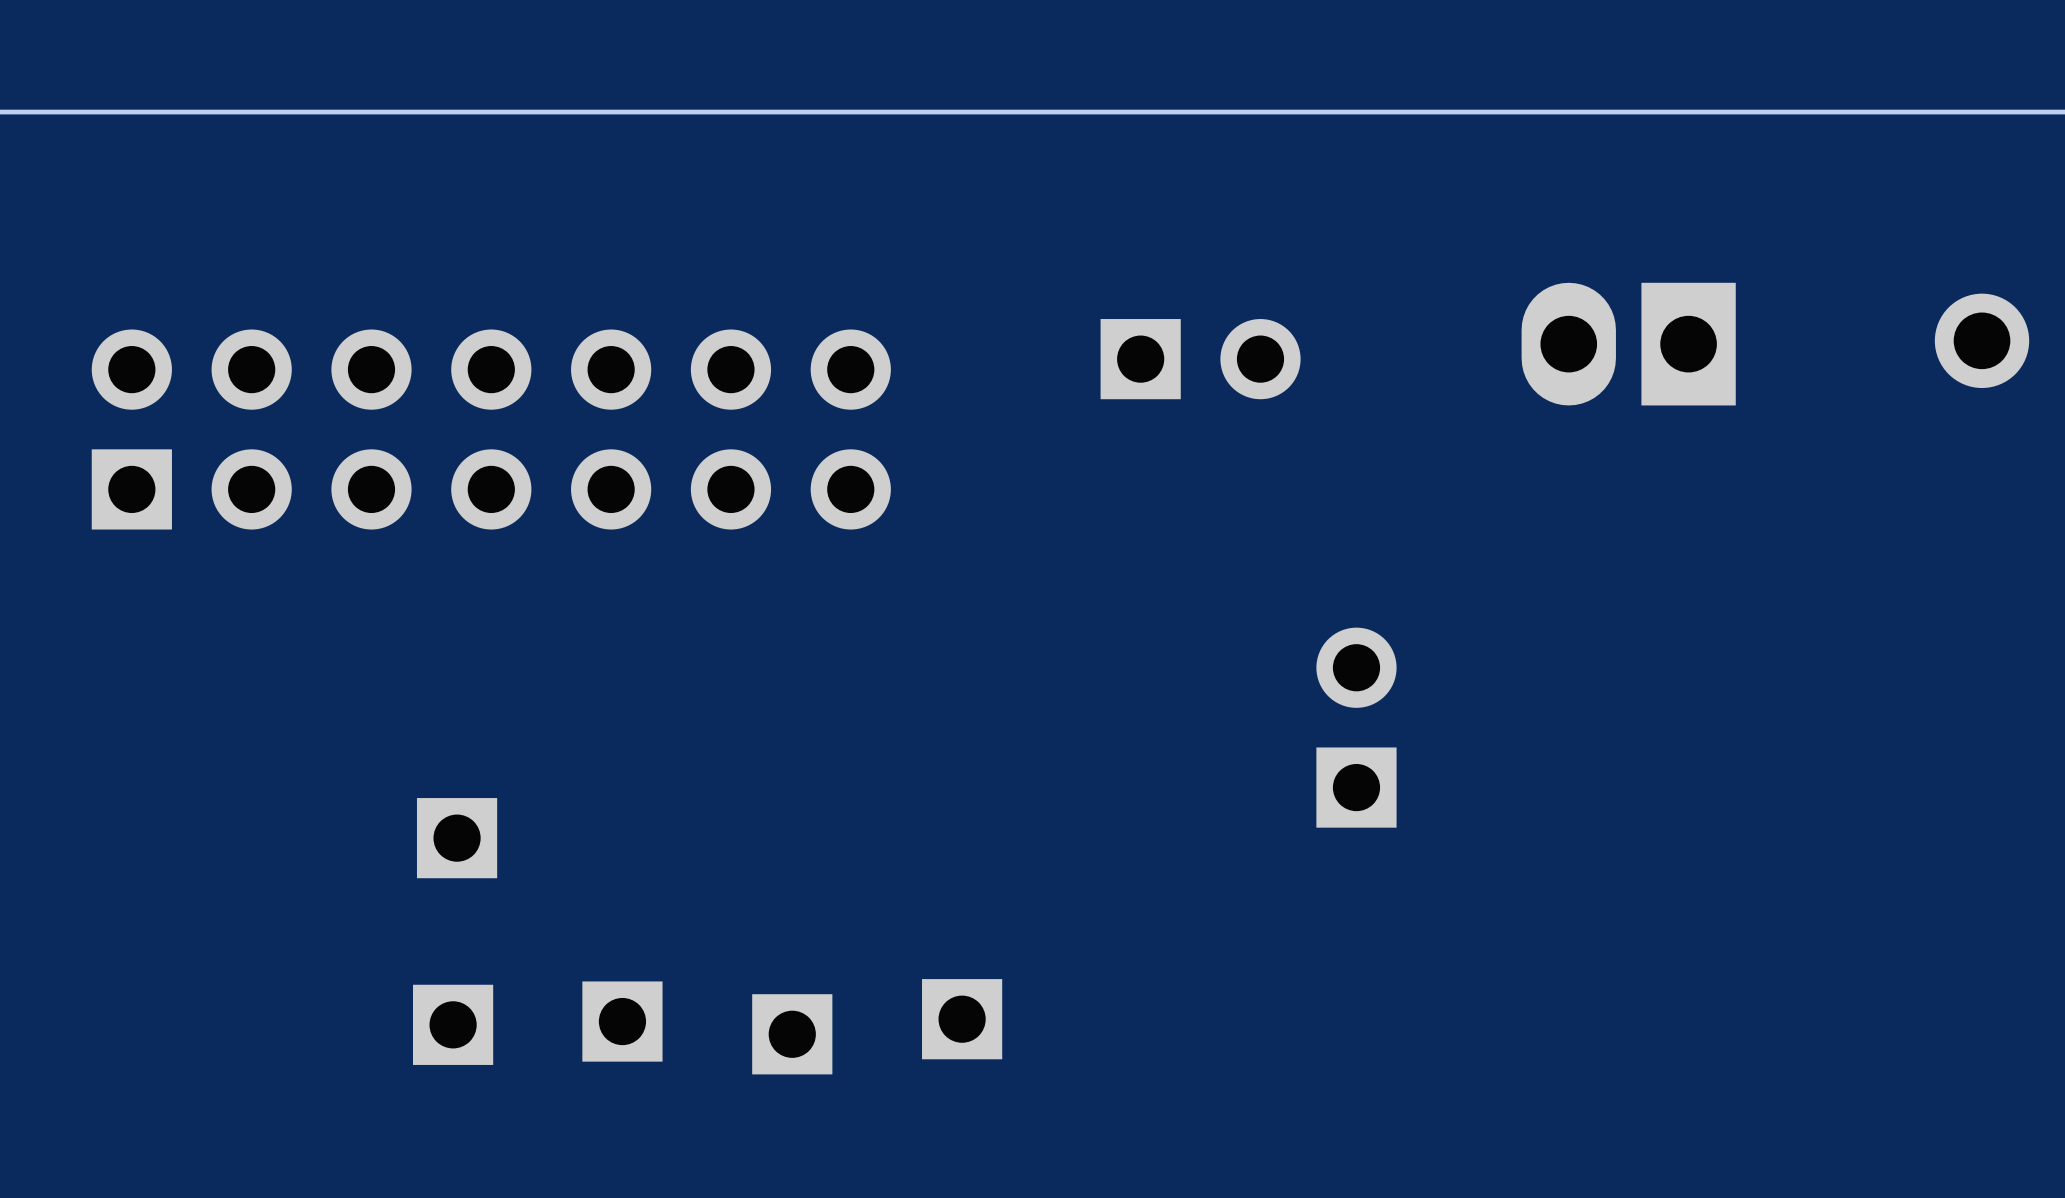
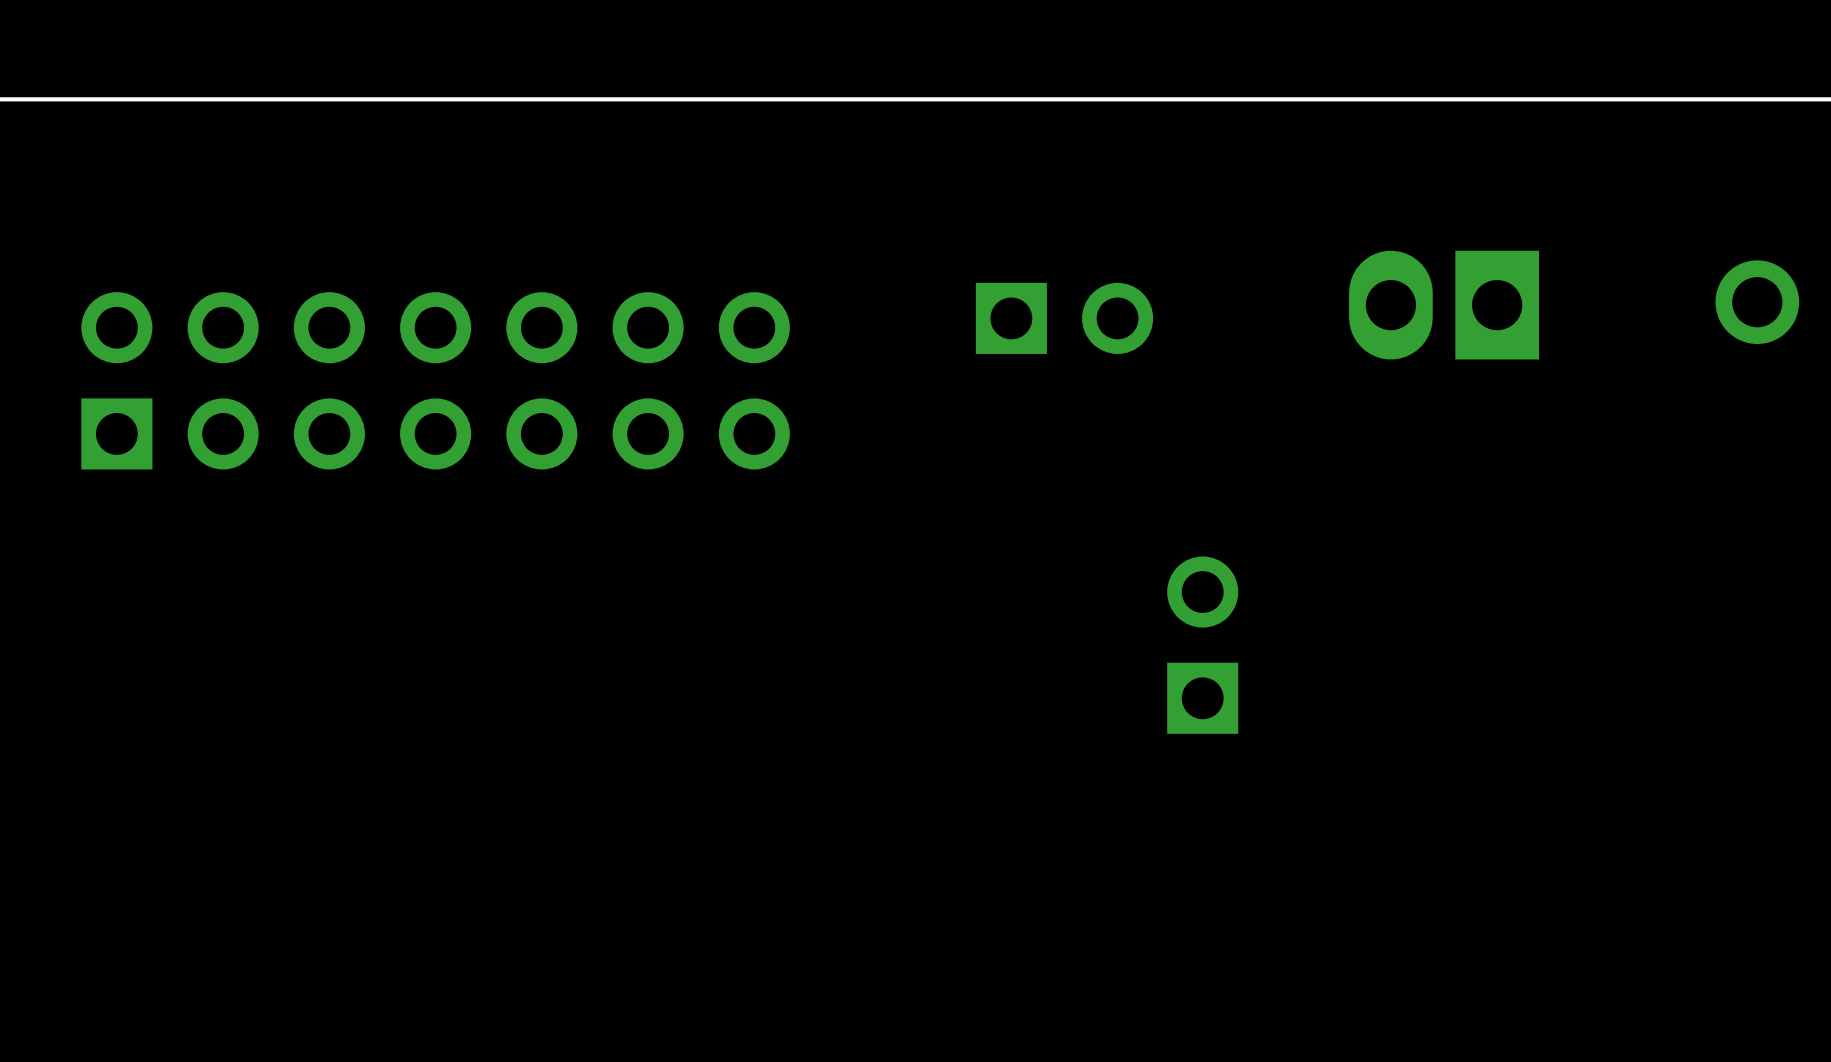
part: (457, 838) -> none
part: (962, 1019) -> none
part: (622, 1021) -> none
part: (453, 1024) -> none
part: (792, 1034) -> none

